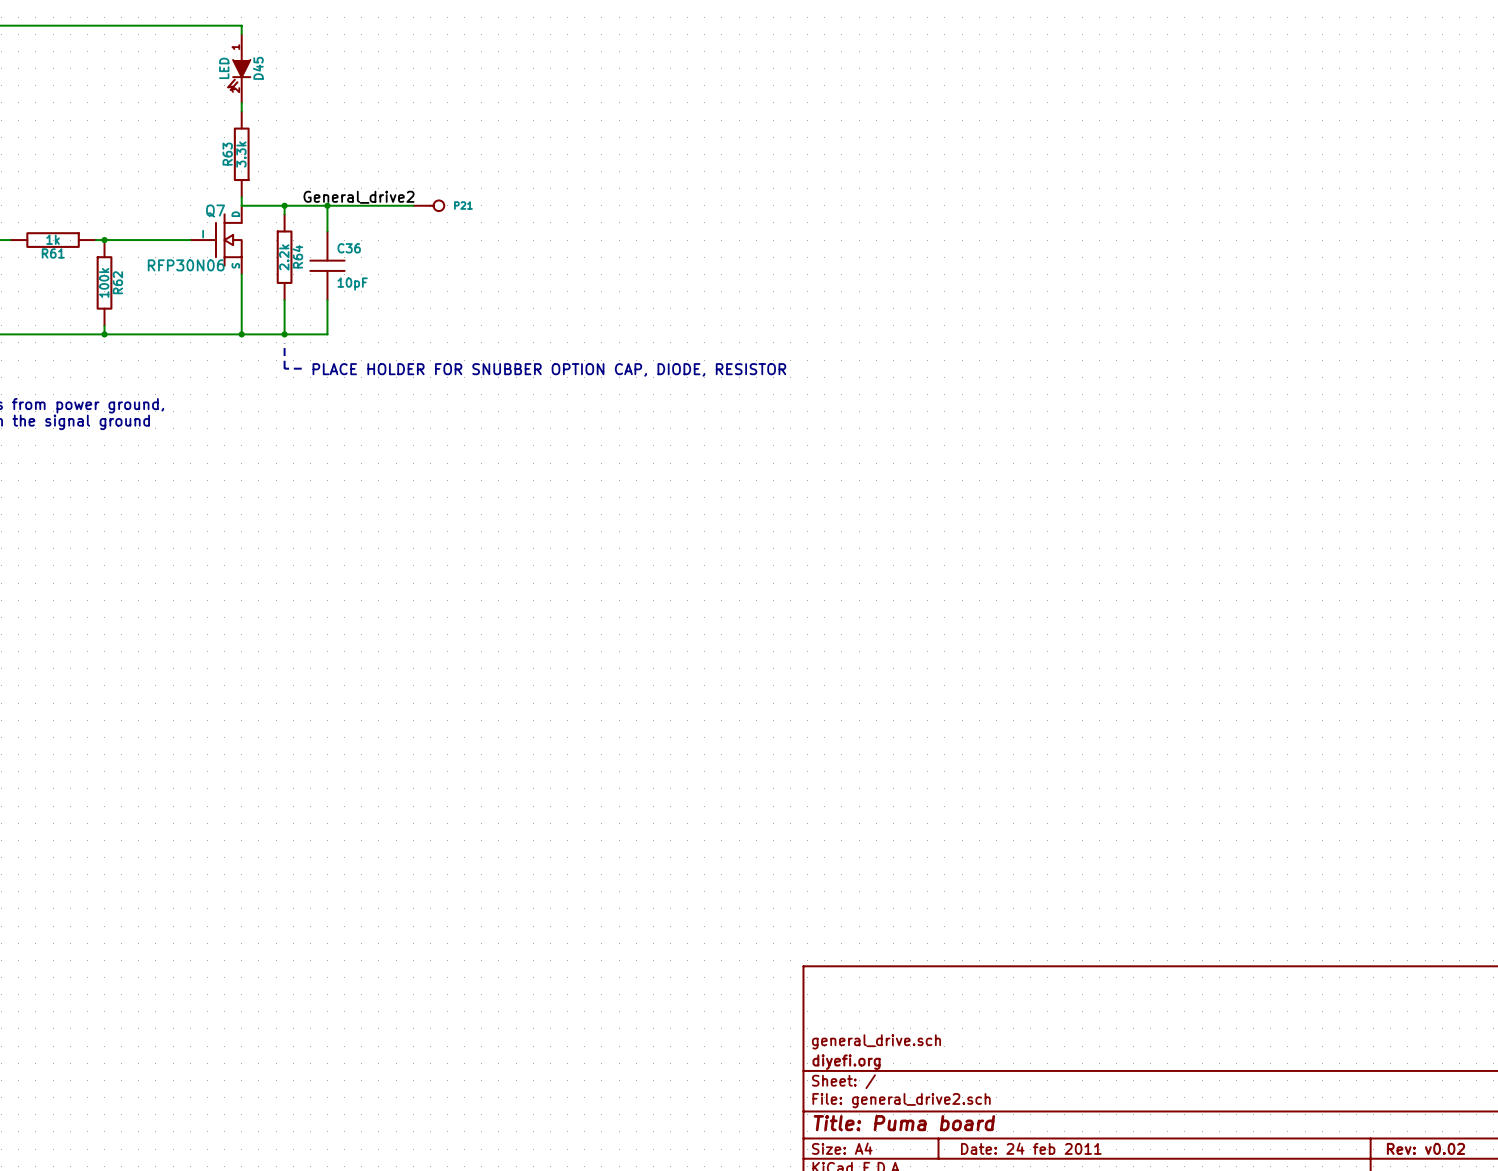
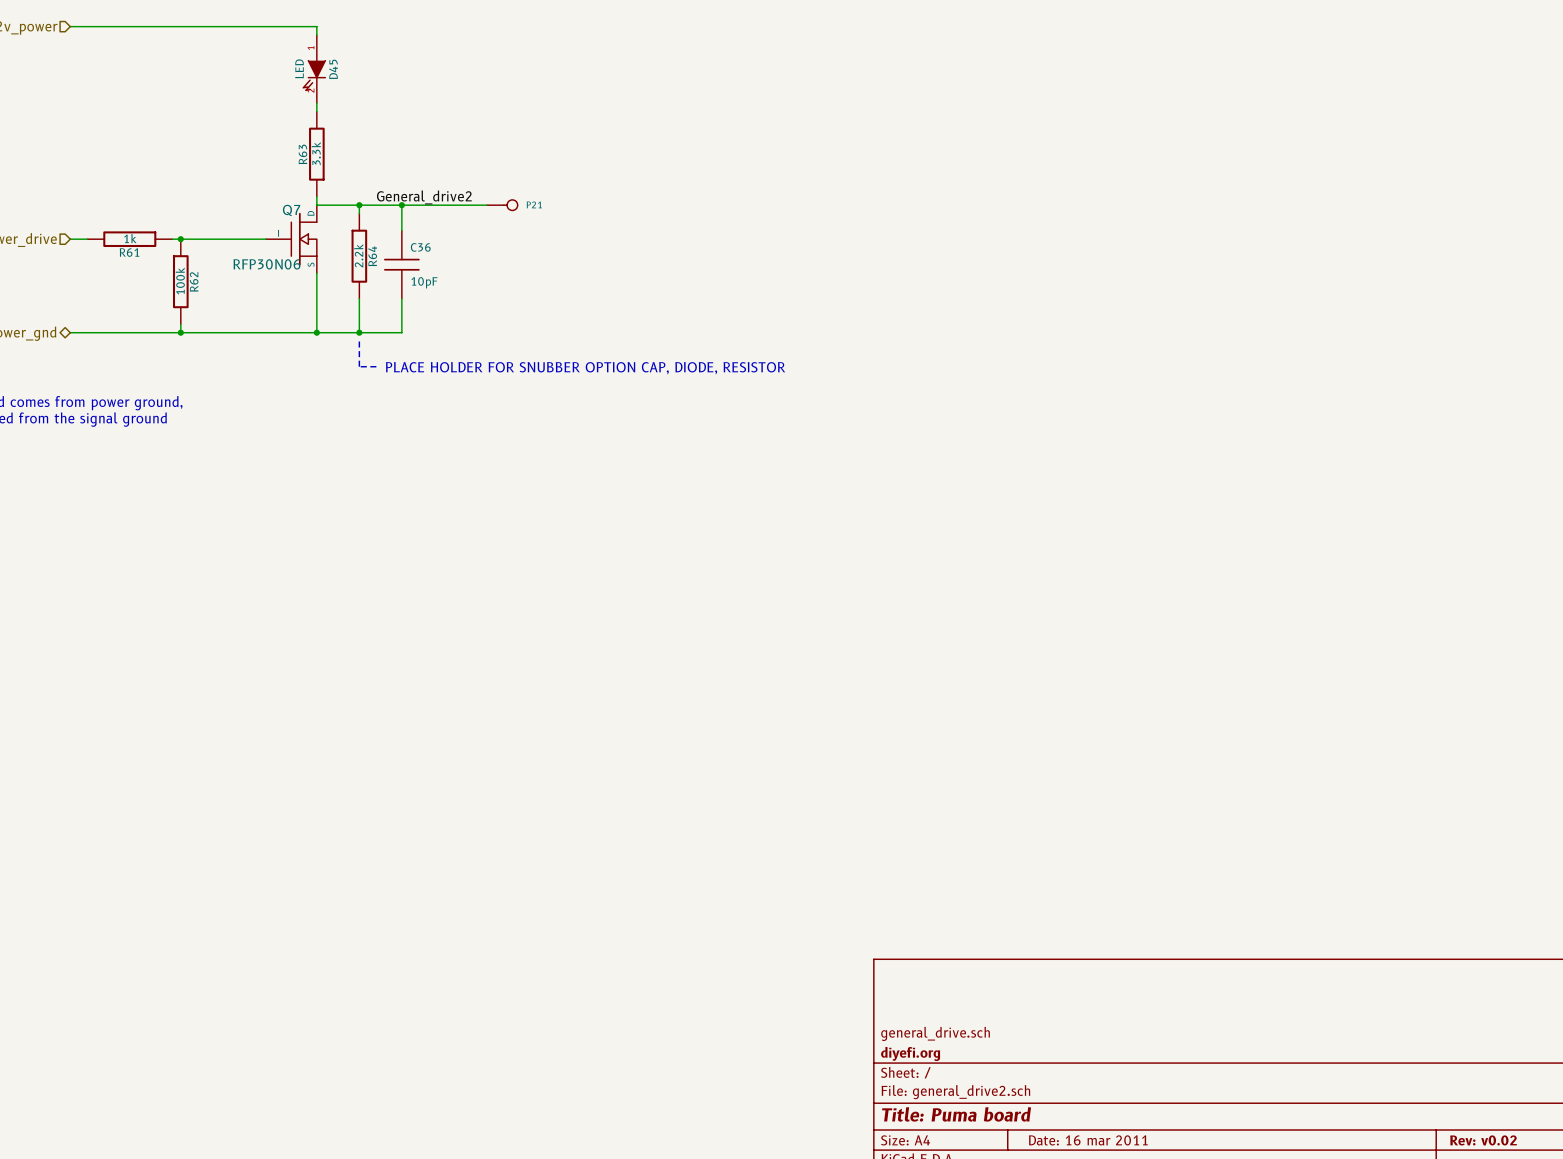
title block: Date: 24 feb 2011 (1031, 1148) -> Date: 16 mar 2011 (1088, 1140)

